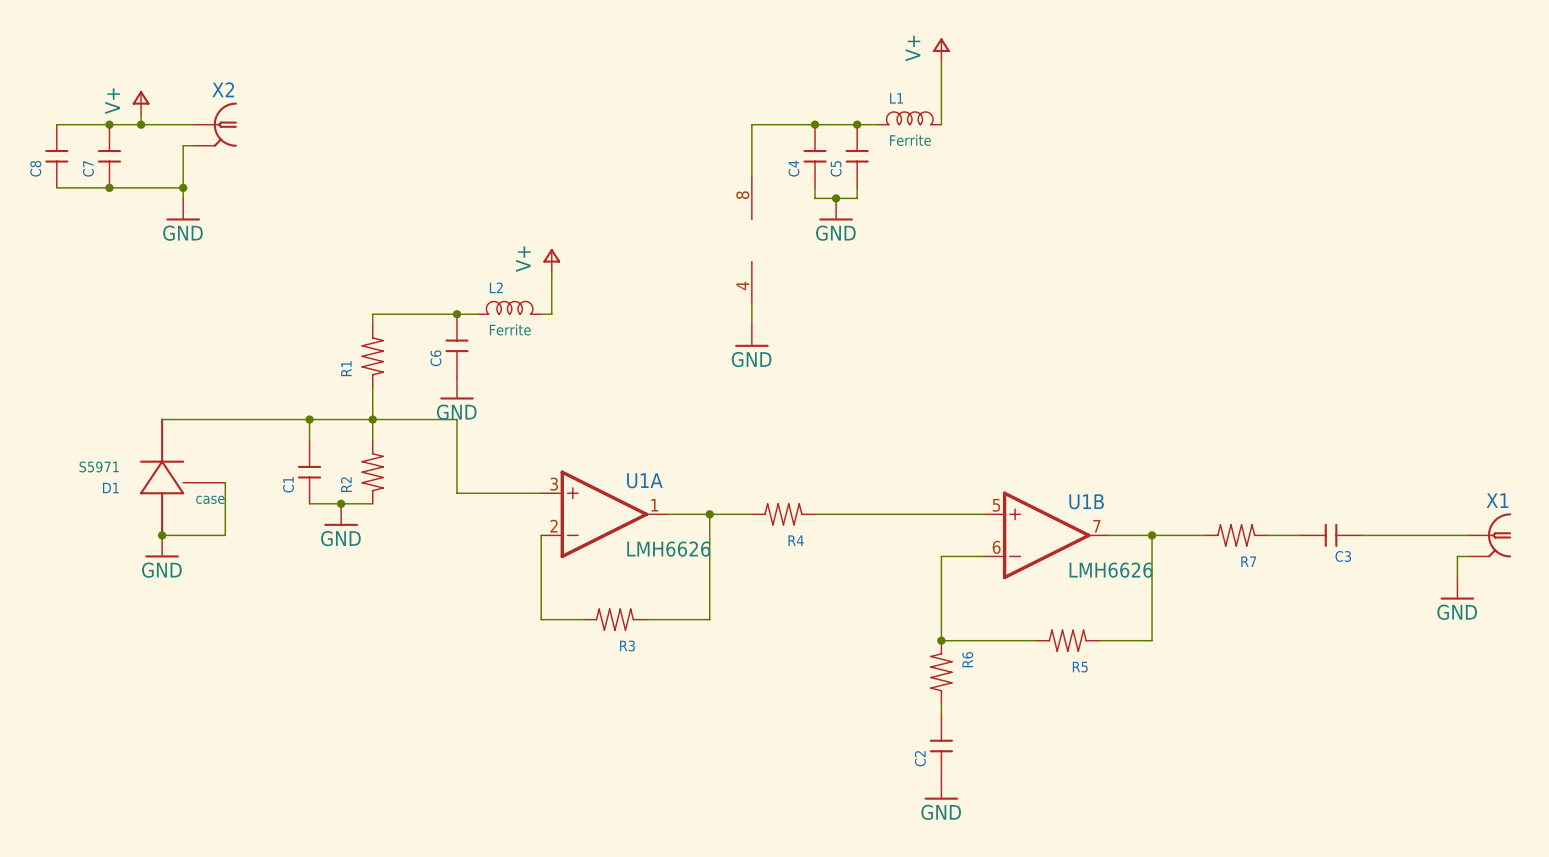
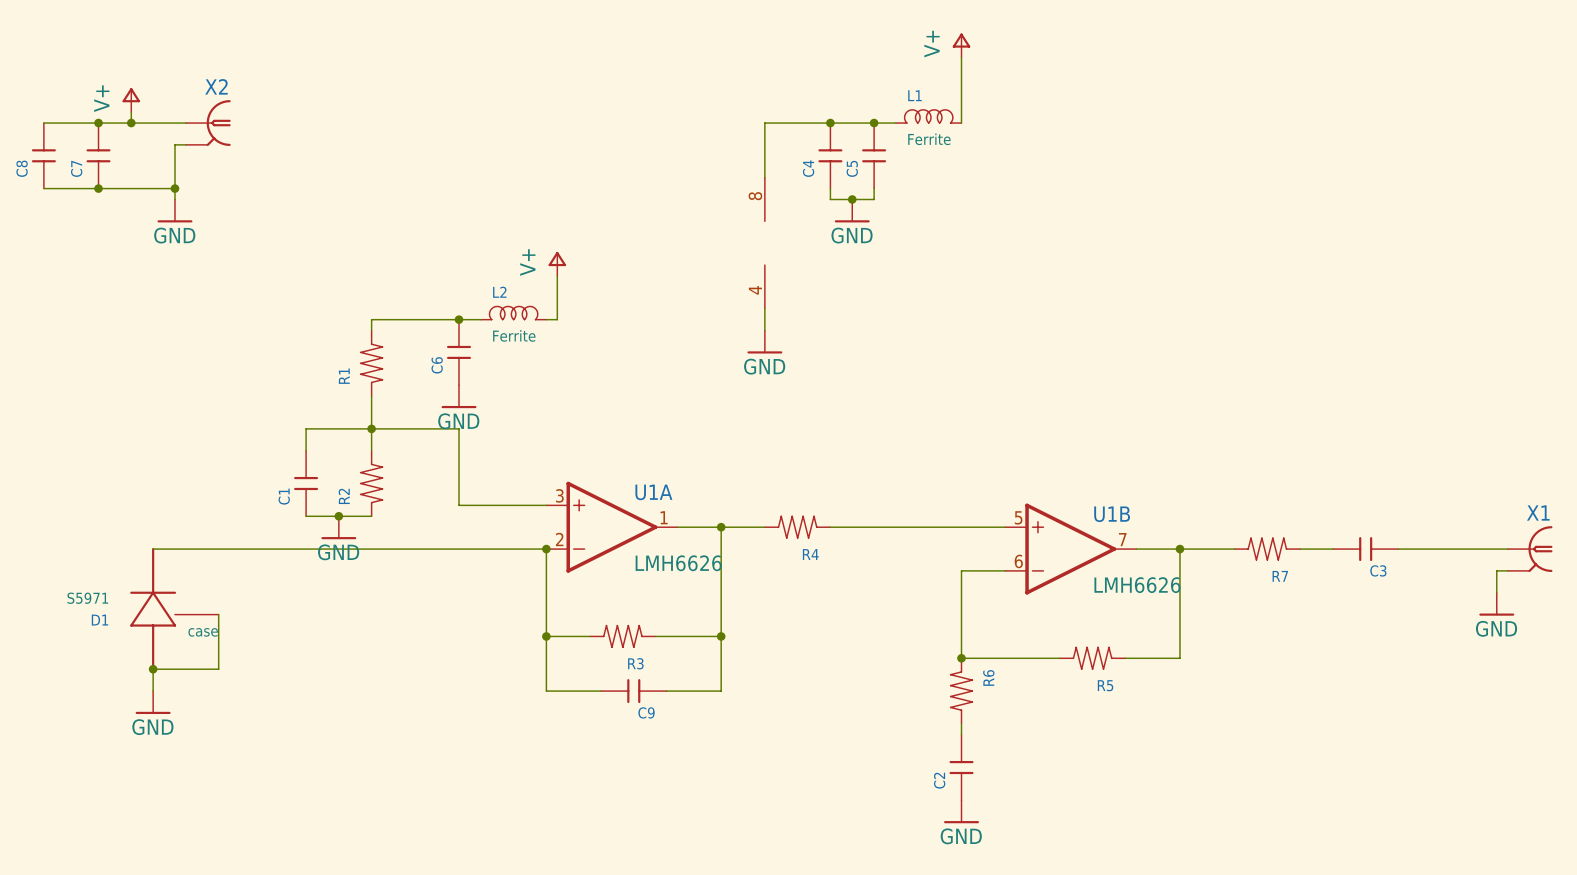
wire: (162, 419) (309, 419) -> none
junction: (309, 419) -> none
D1 position: (182, 477) -> (174, 609)
wire: (225, 482) (225, 535) -> (546, 549) (218, 549)
junction: (162, 535) -> none
junction: none -> (546, 549)
power symbol position: GND (162, 546) -> GND (153, 702)
wire: none -> (218, 614) (218, 669) (153, 669) (153, 691)
wire: none -> (546, 636) (546, 691) (601, 691)
junction: none -> (546, 636)
wire: none -> (721, 636) (721, 691) (666, 691)
junction: none -> (721, 636)
junction: none -> (153, 669)
C9: none -> (633, 691)

